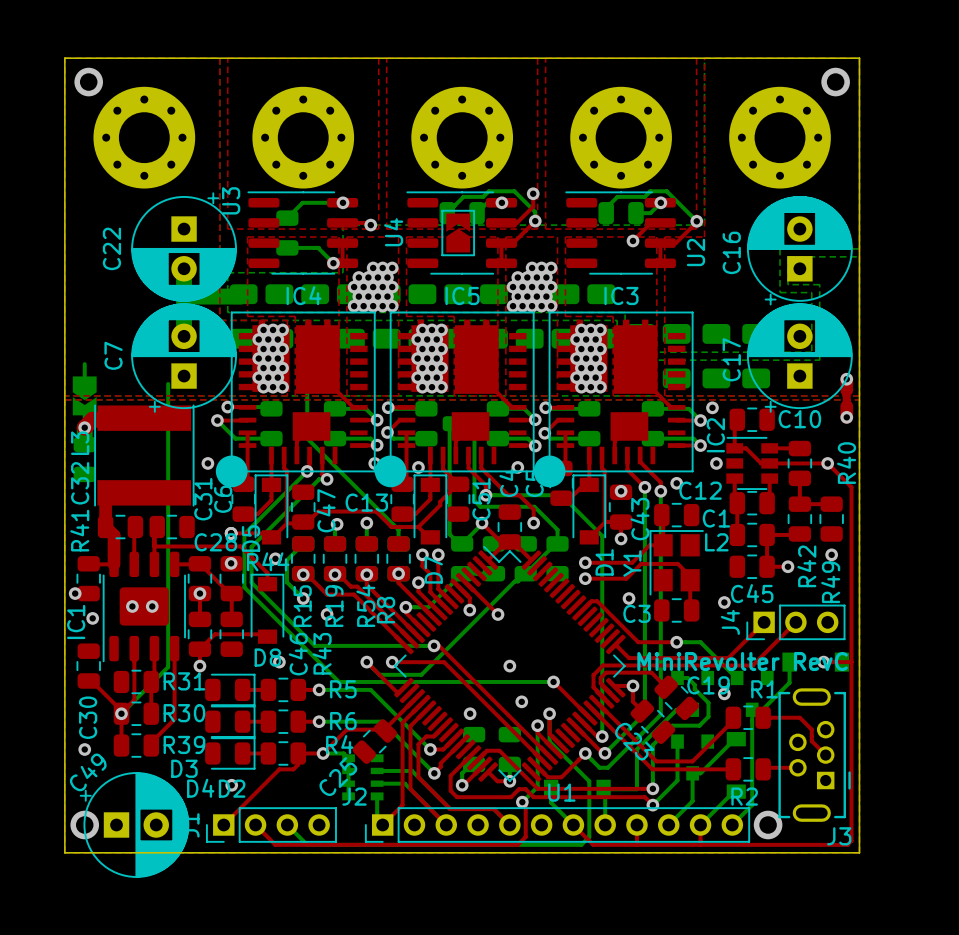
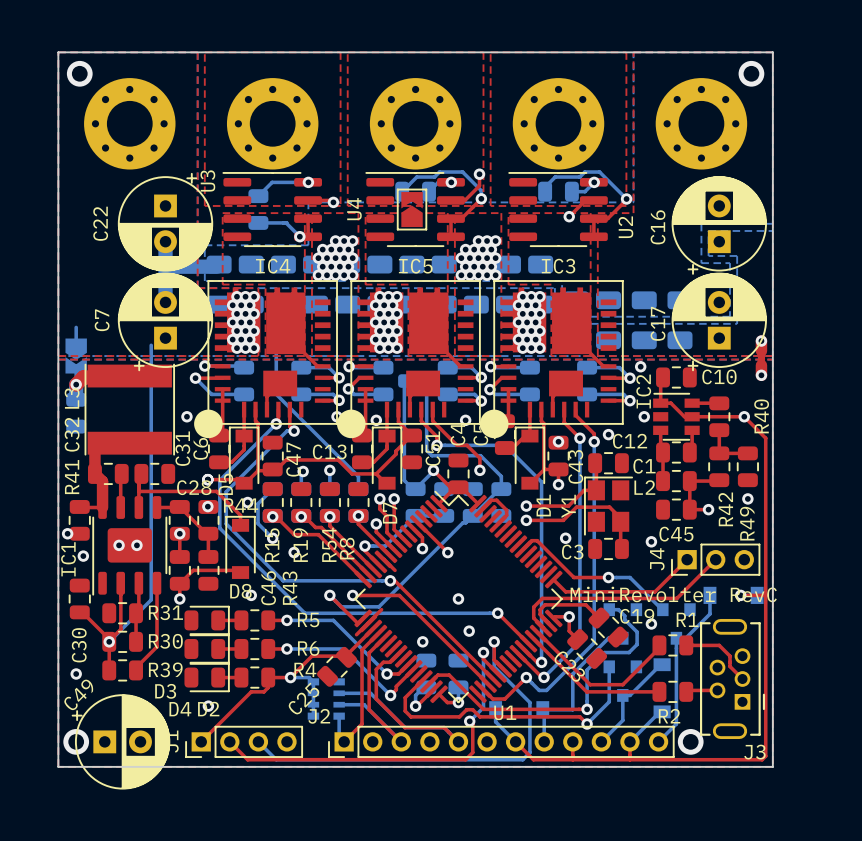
top track: none -> (482, 508) (490, 500) (496, 500) (506, 510) (506, 515) (498, 523)
top track: none -> (383, 559) (395, 570)
top track: none -> (381, 609) (356, 634)

